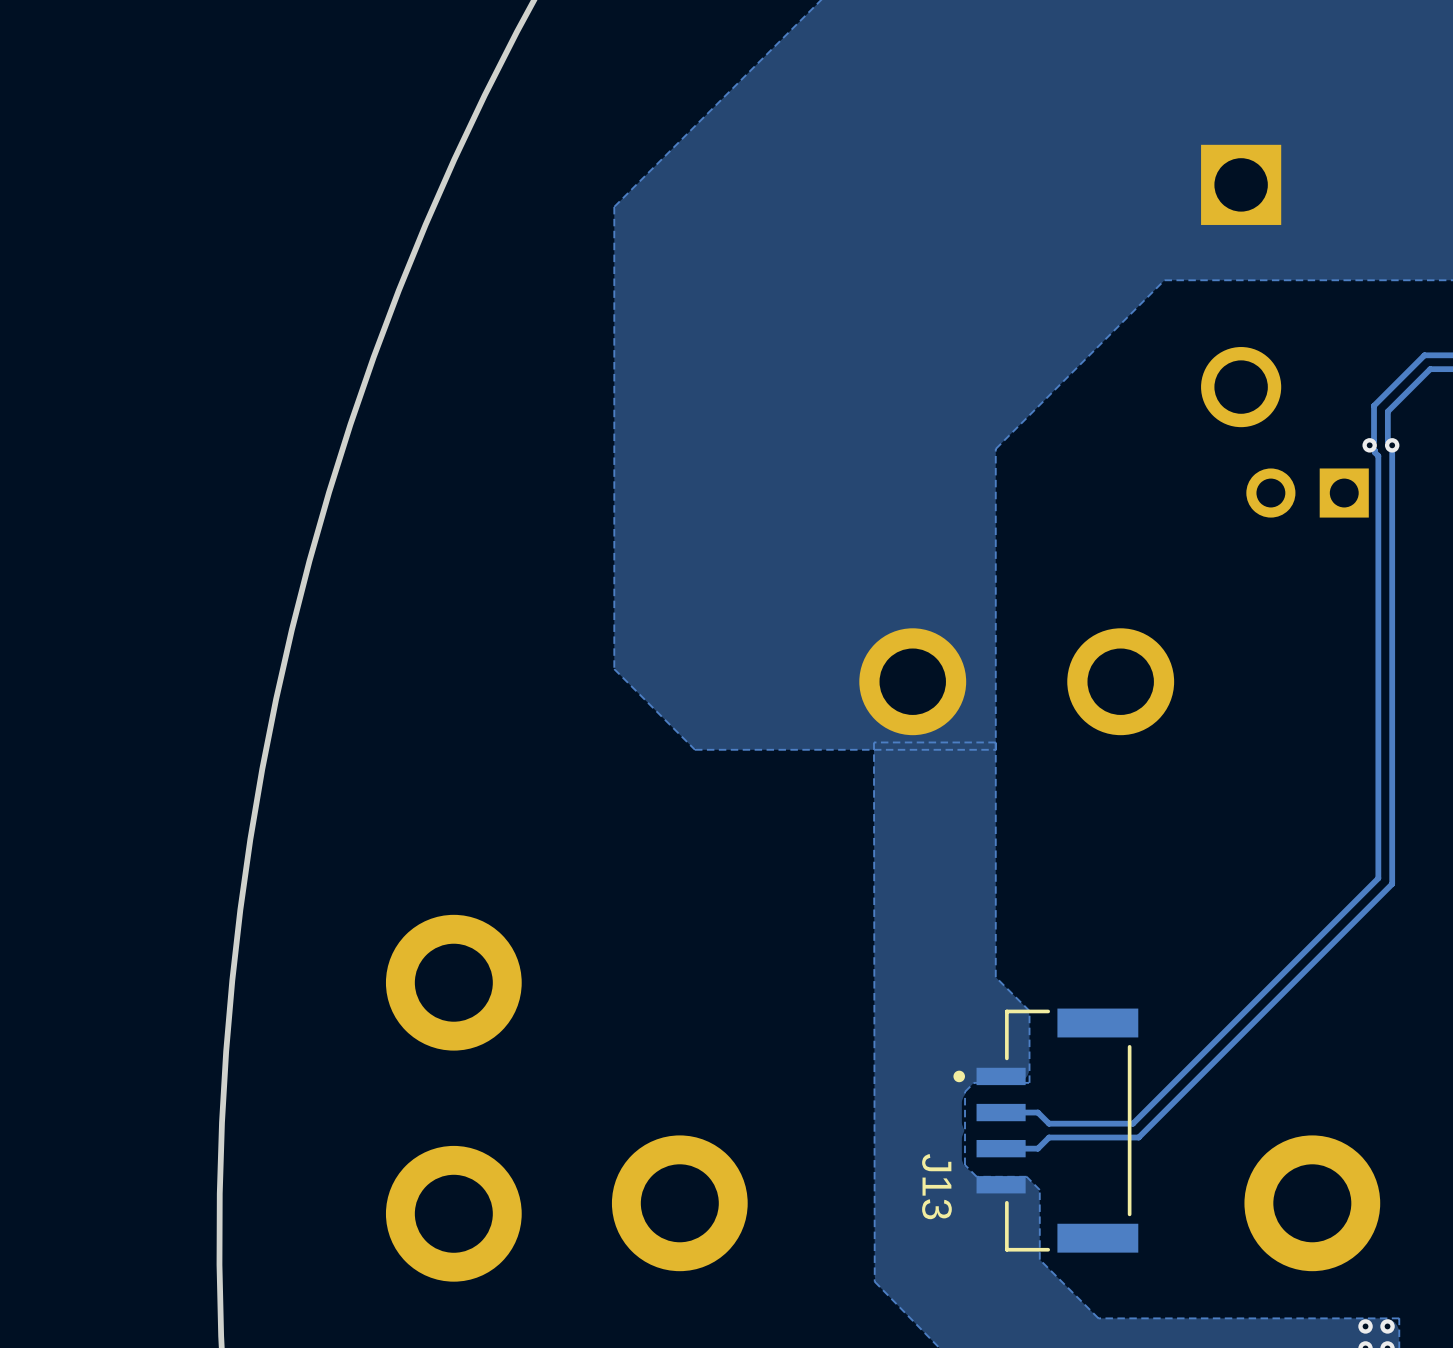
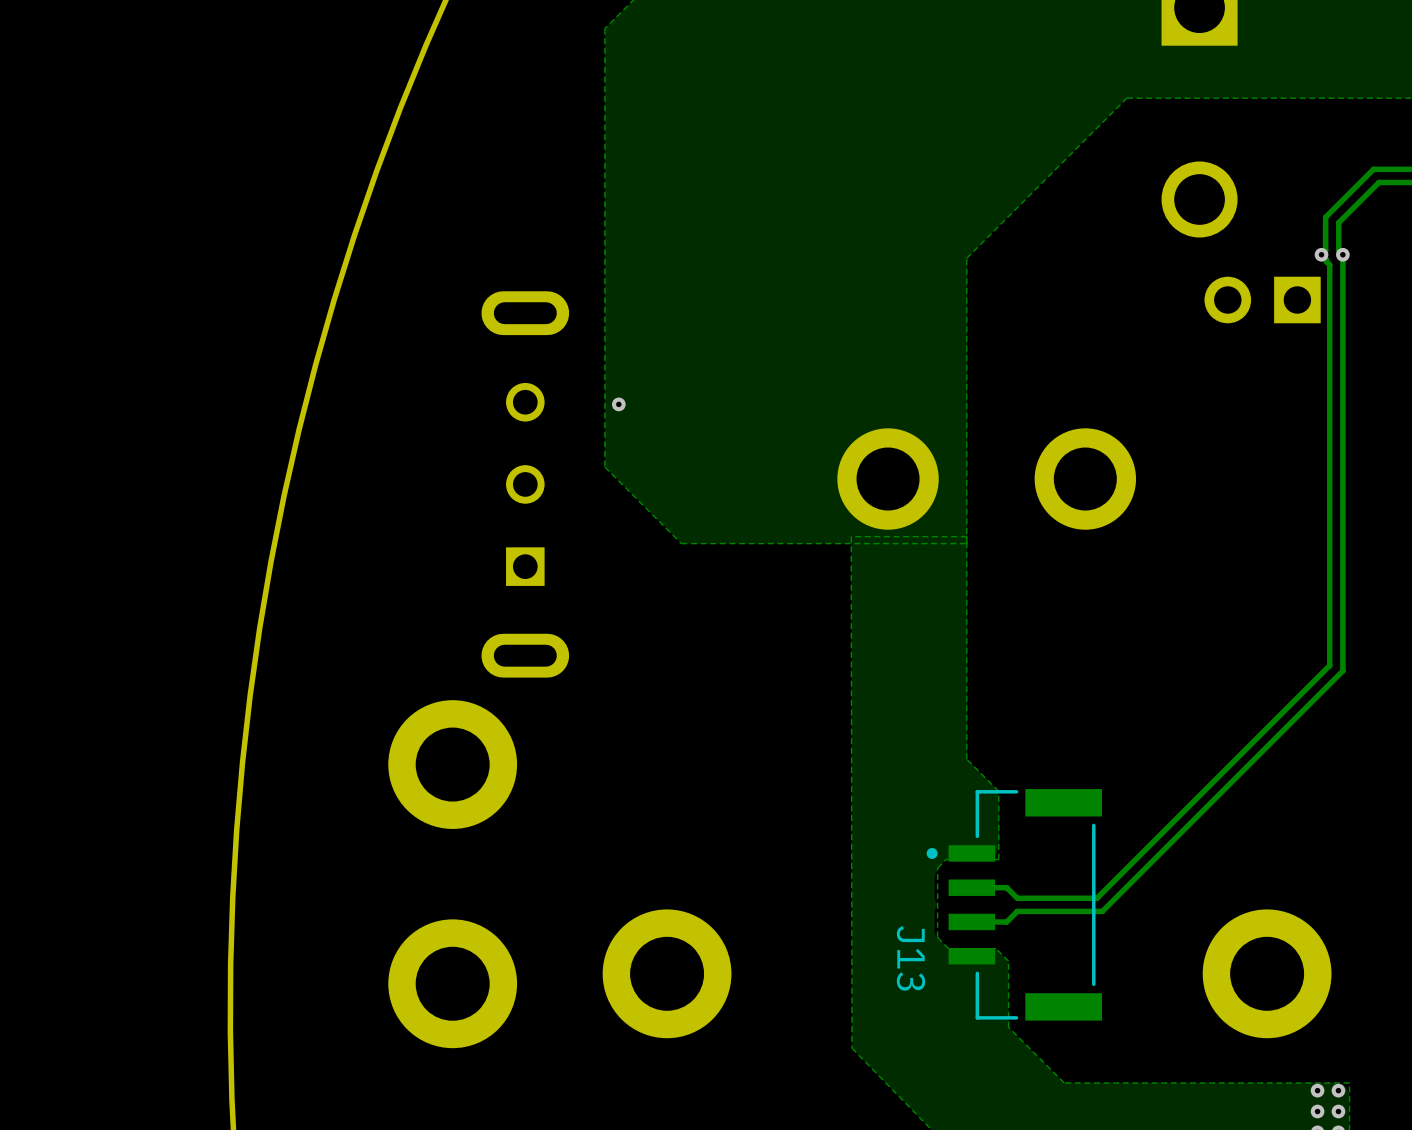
via: none -> (618, 404)
part: none -> (525, 484)

